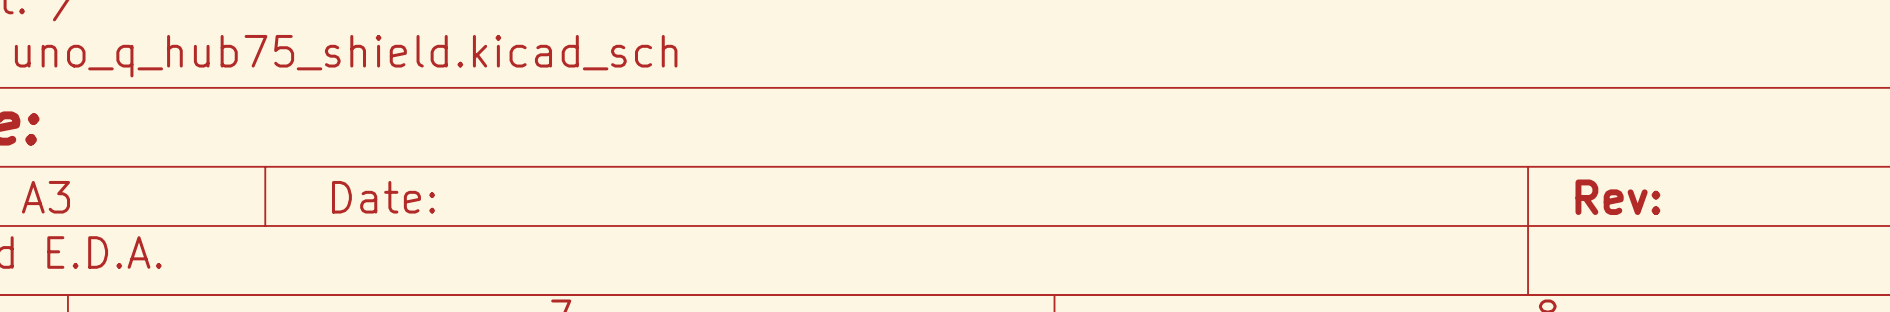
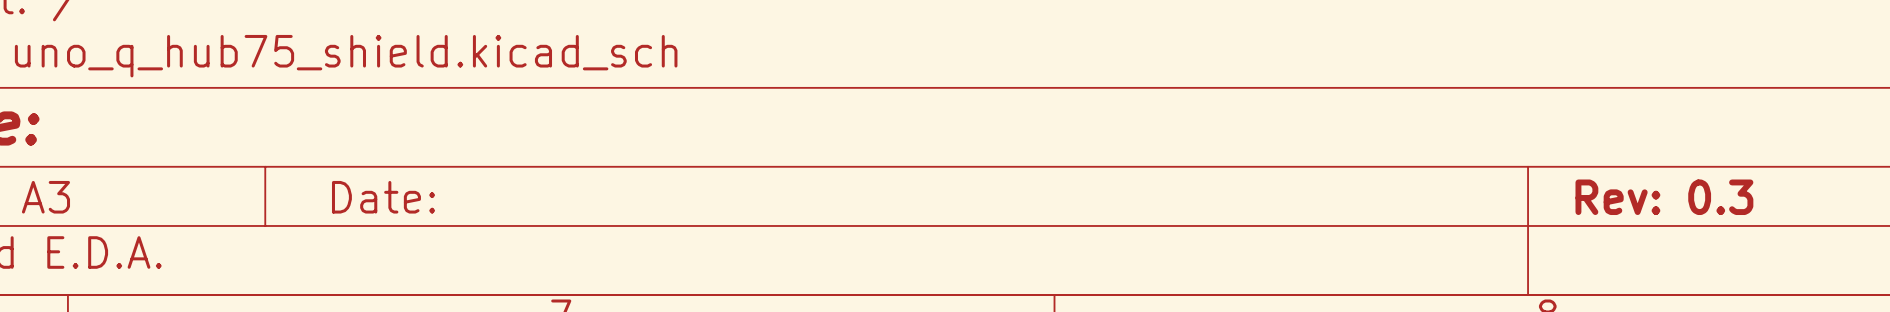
title block: Rev: (1617, 197) -> Rev: 0.3 (1664, 197)

